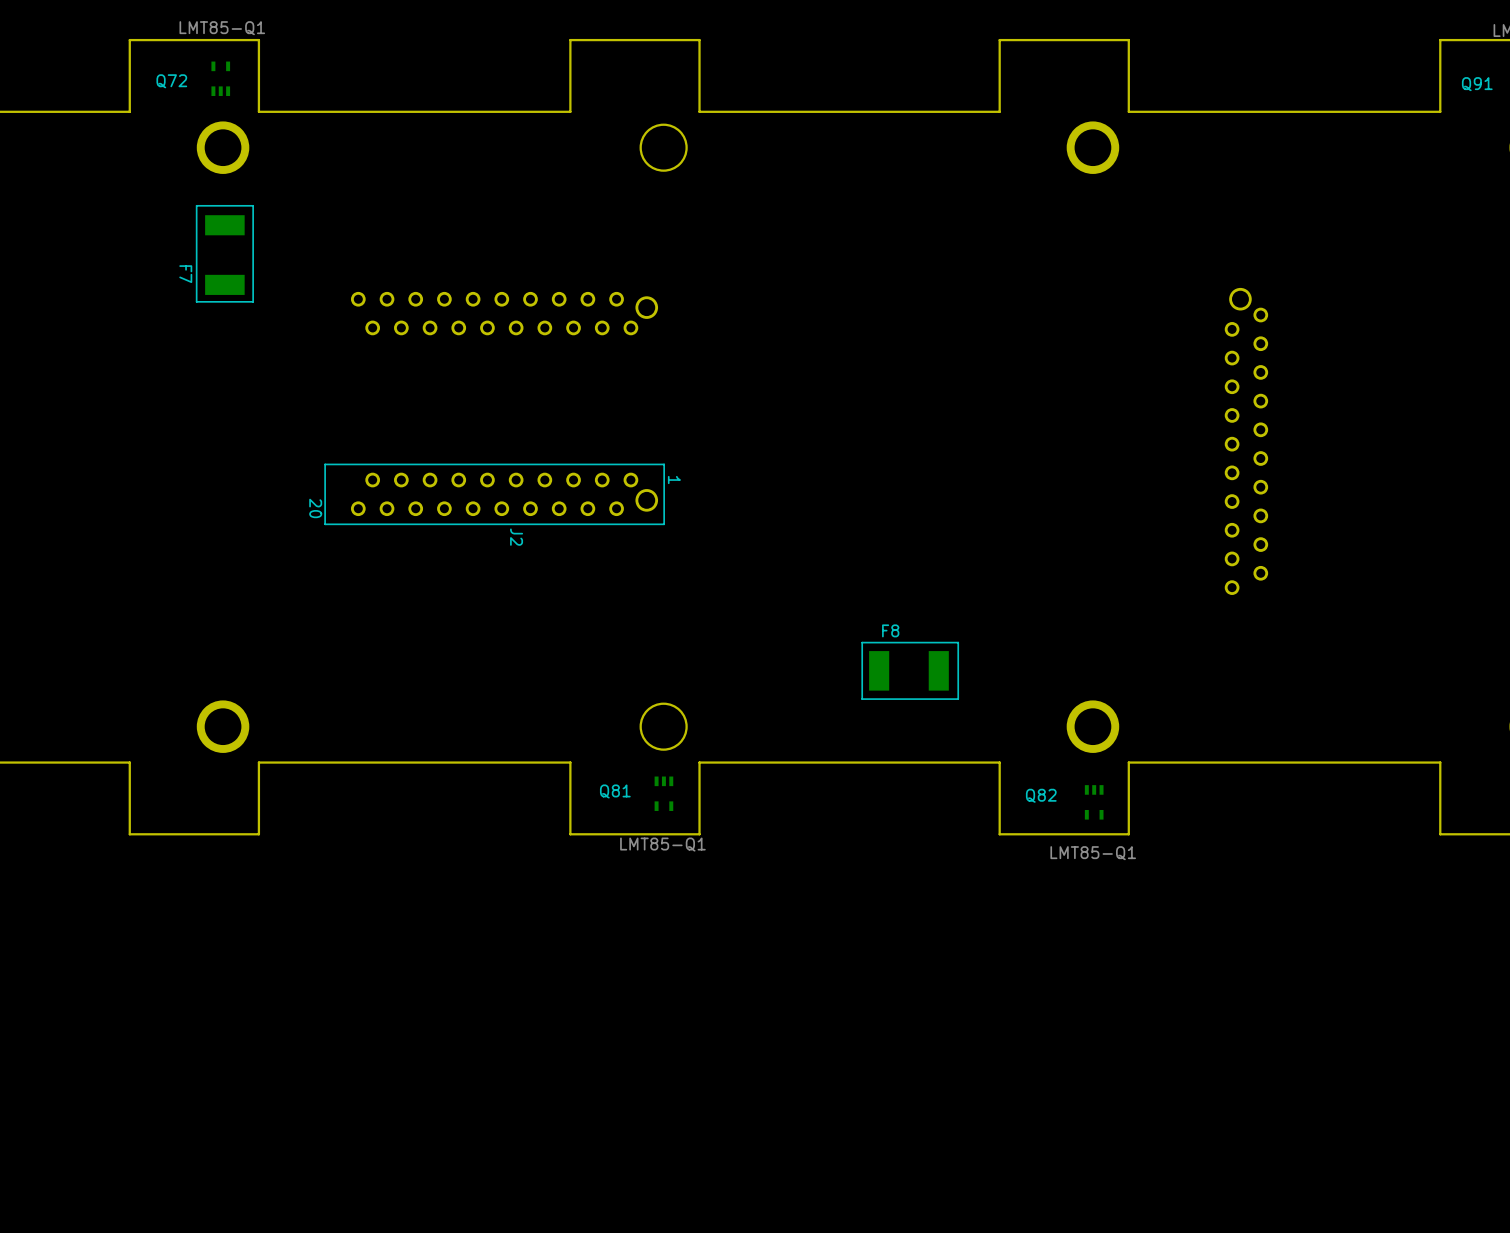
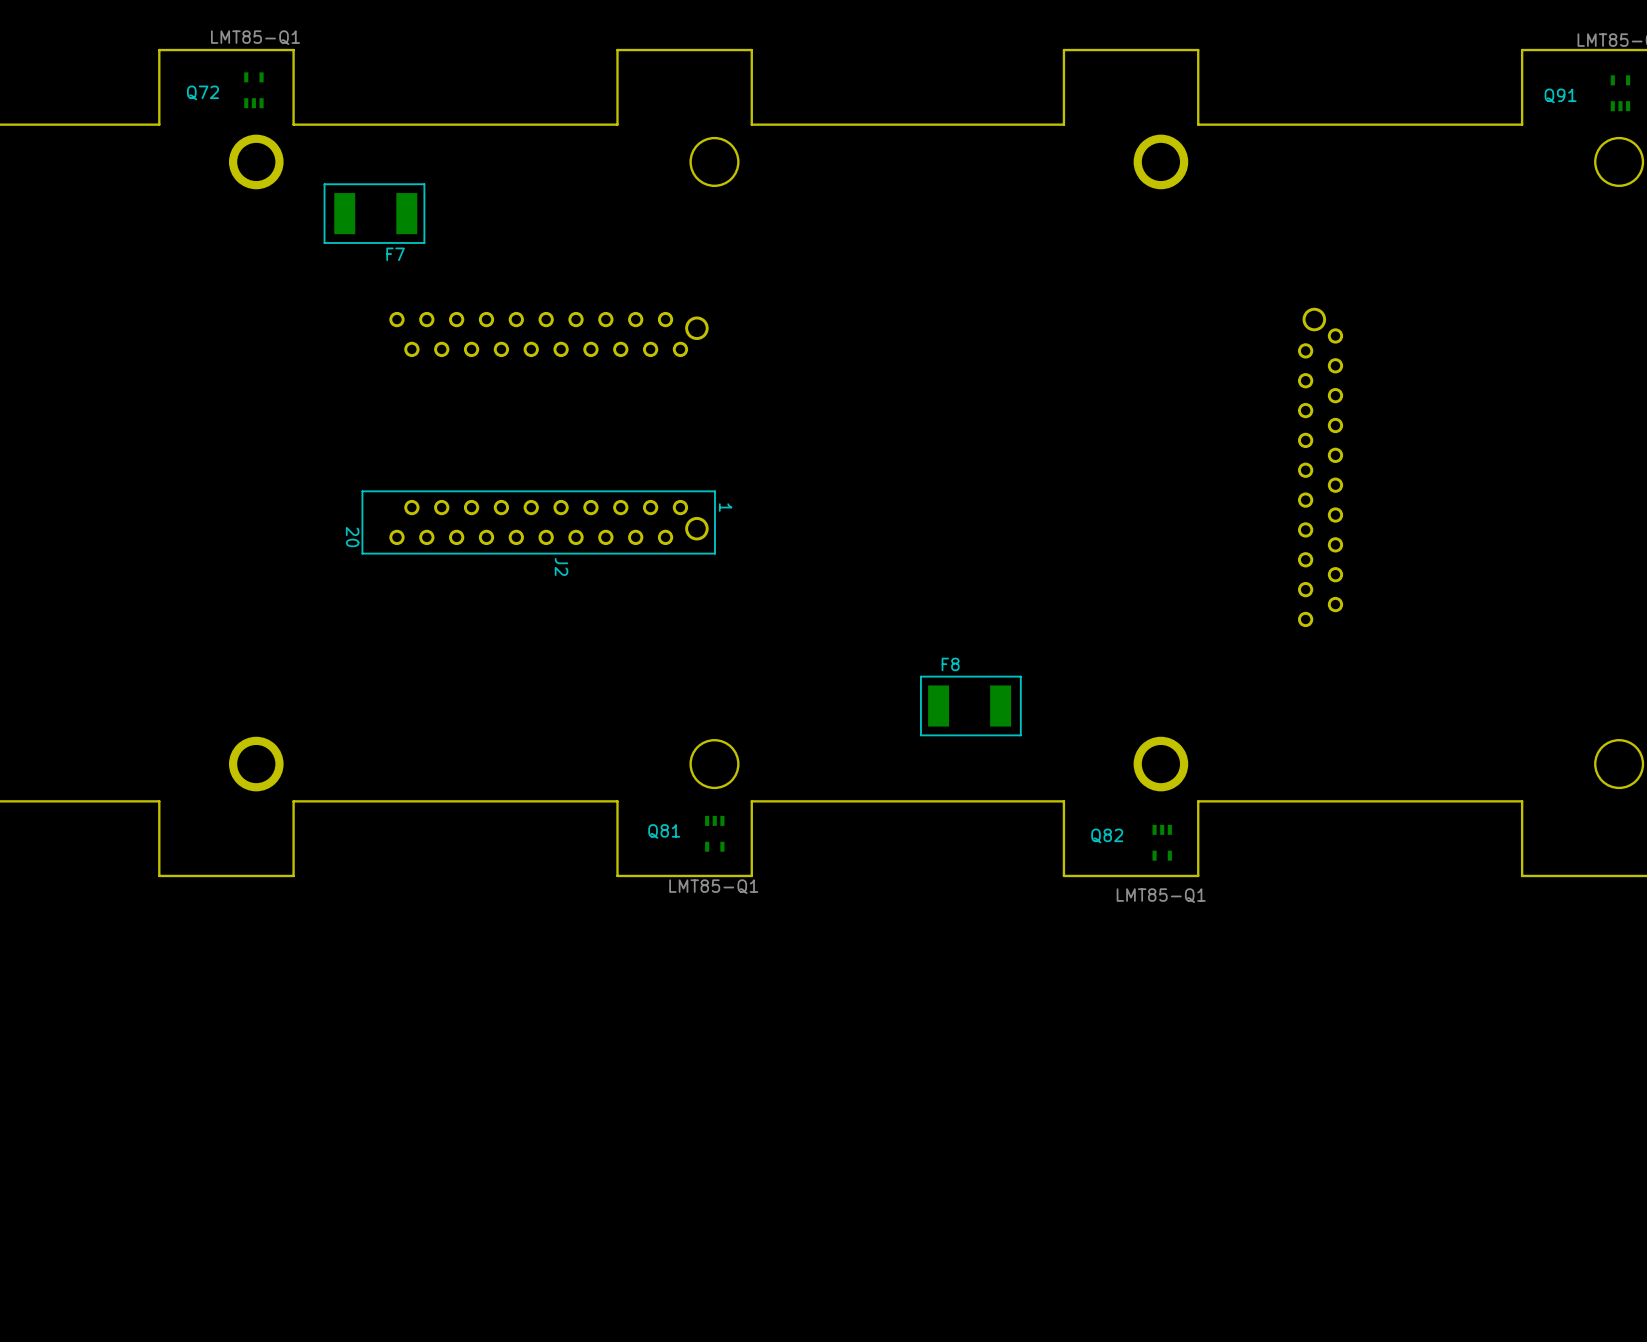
F7 rotation: 0° (224, 253) -> 90° counterclockwise (374, 213)
F7 position: (224, 253) -> (374, 213)

